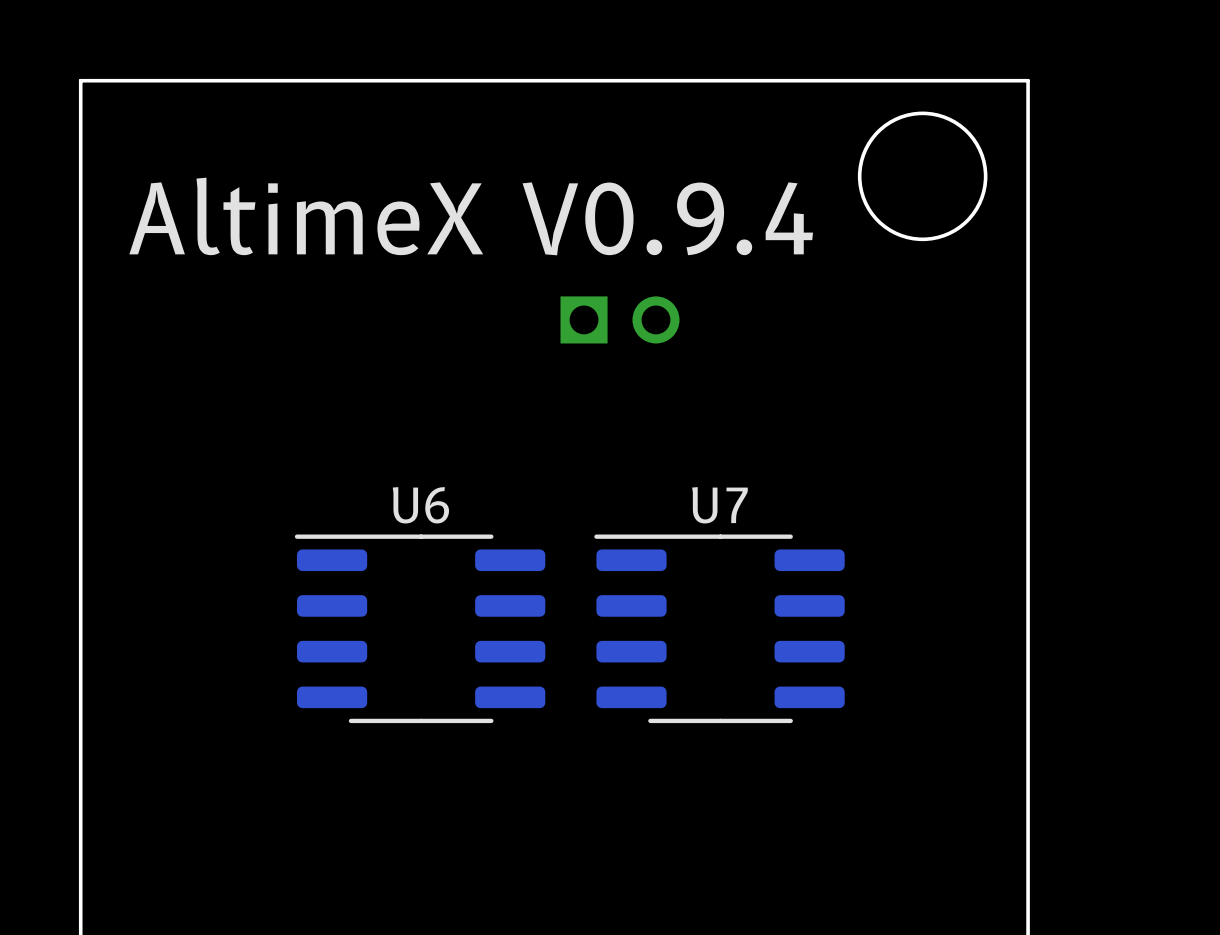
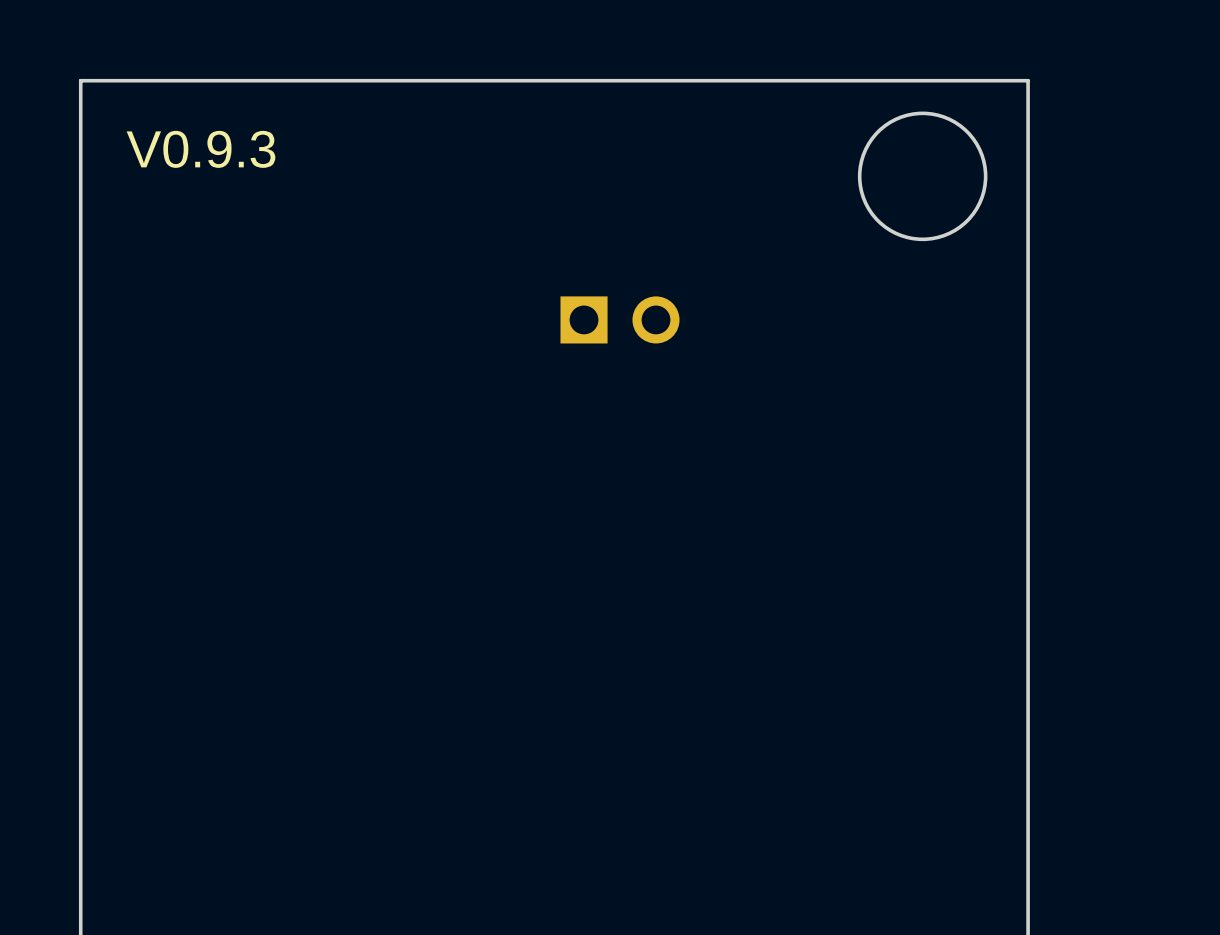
text: none -> V0.9.3 (201, 149)
text: AltimeX V0.9.4 (471, 216) -> none
U6: (420, 628) -> none
U7: (719, 628) -> none

